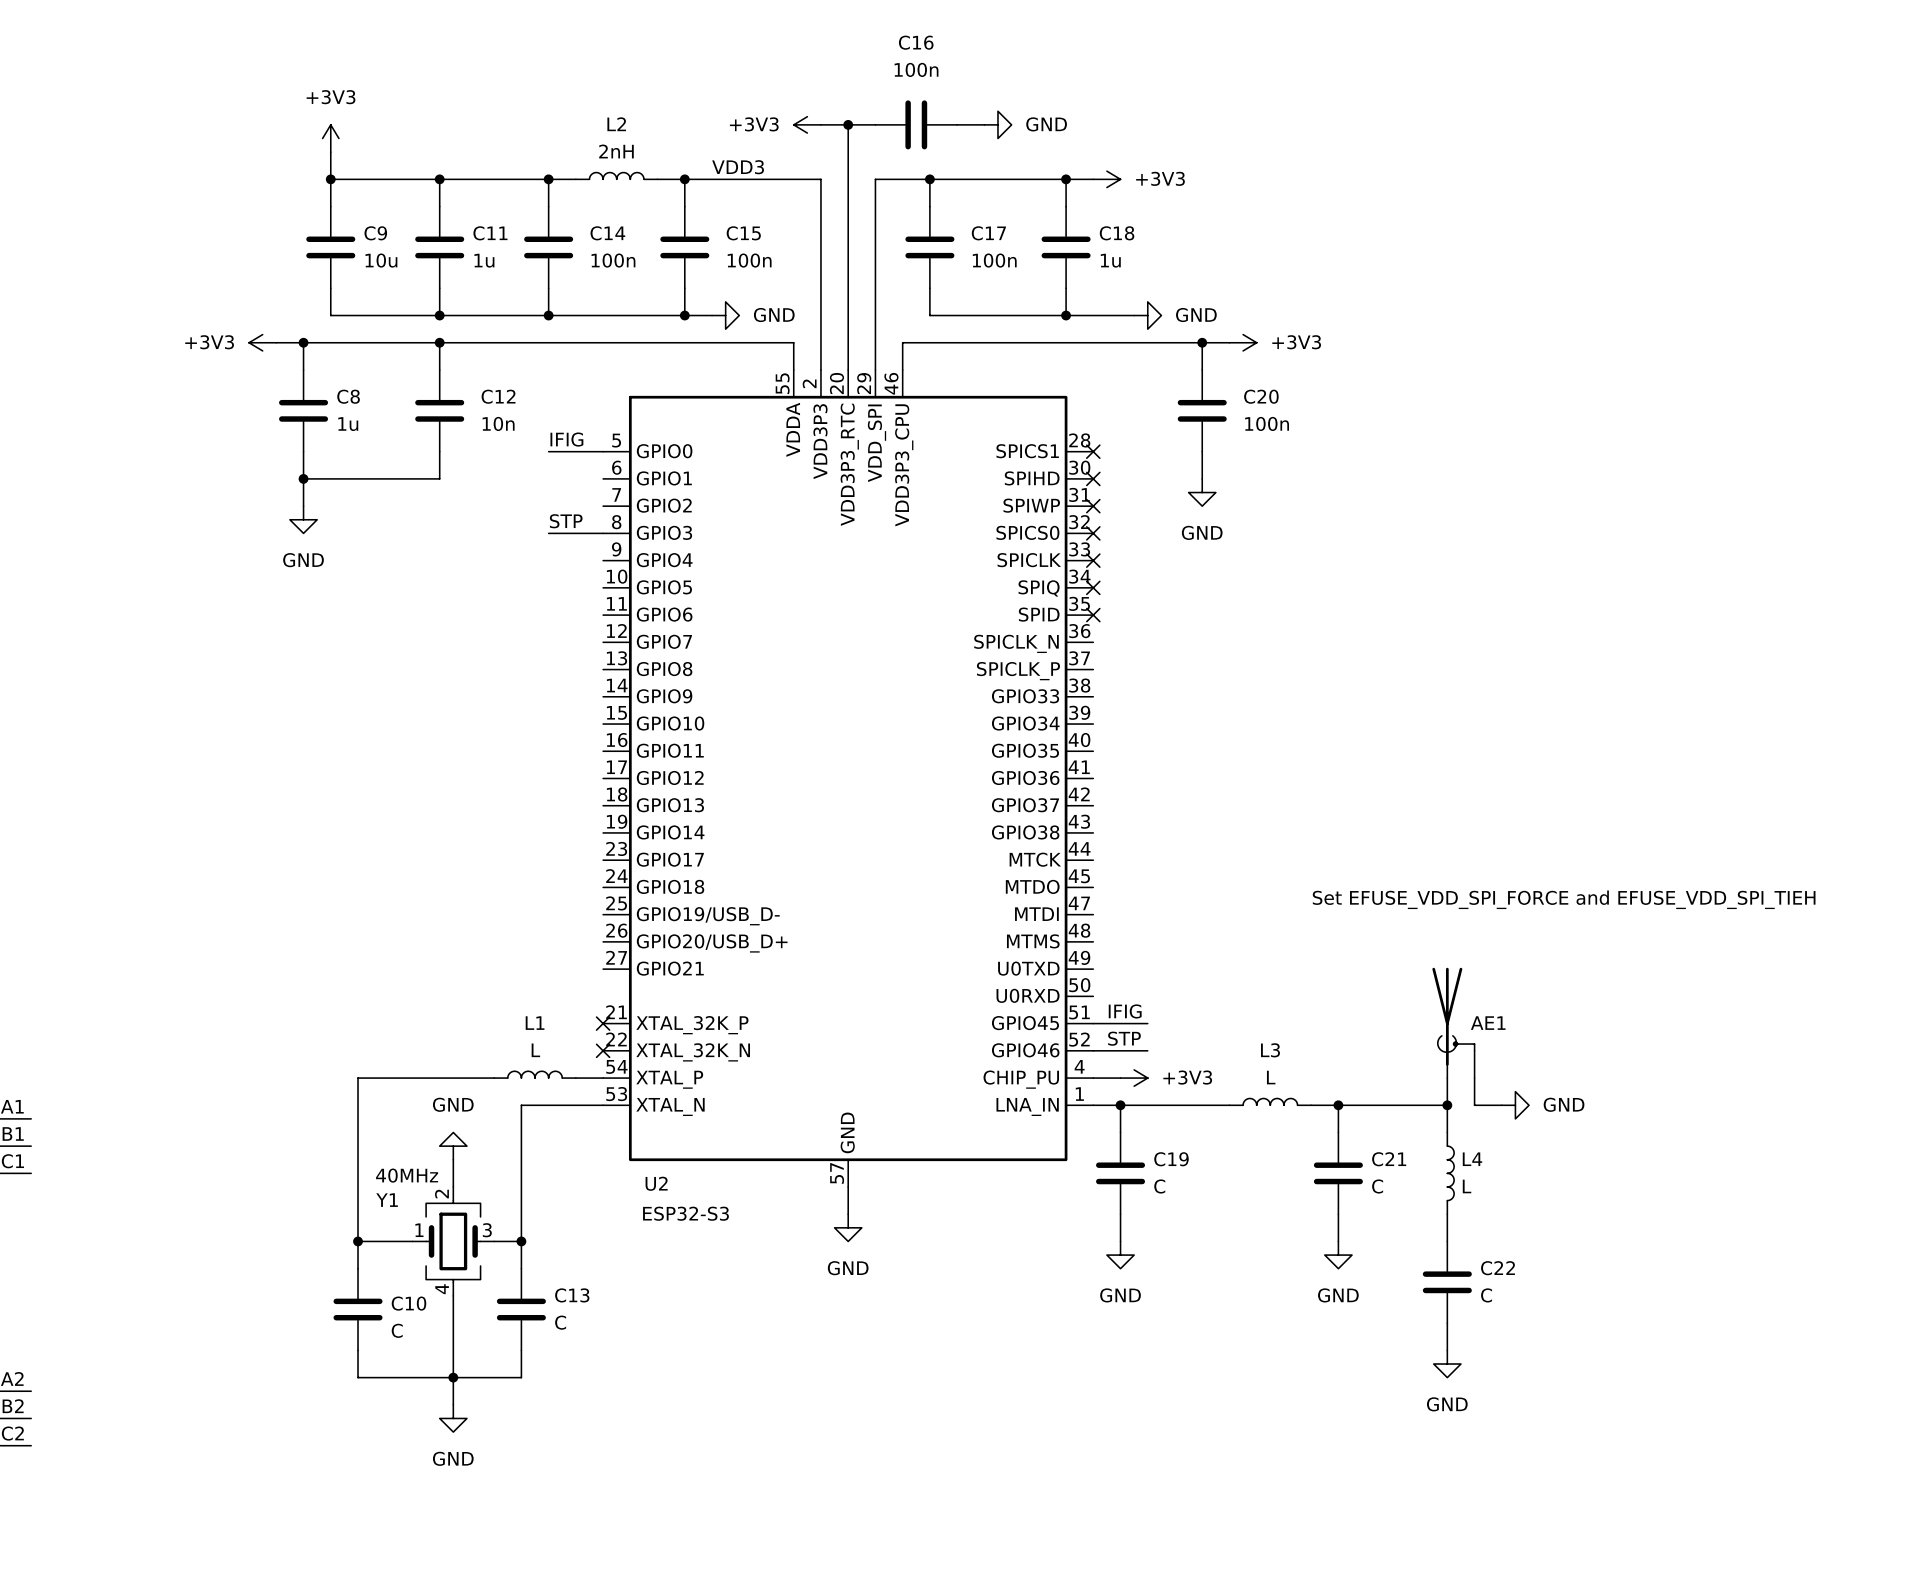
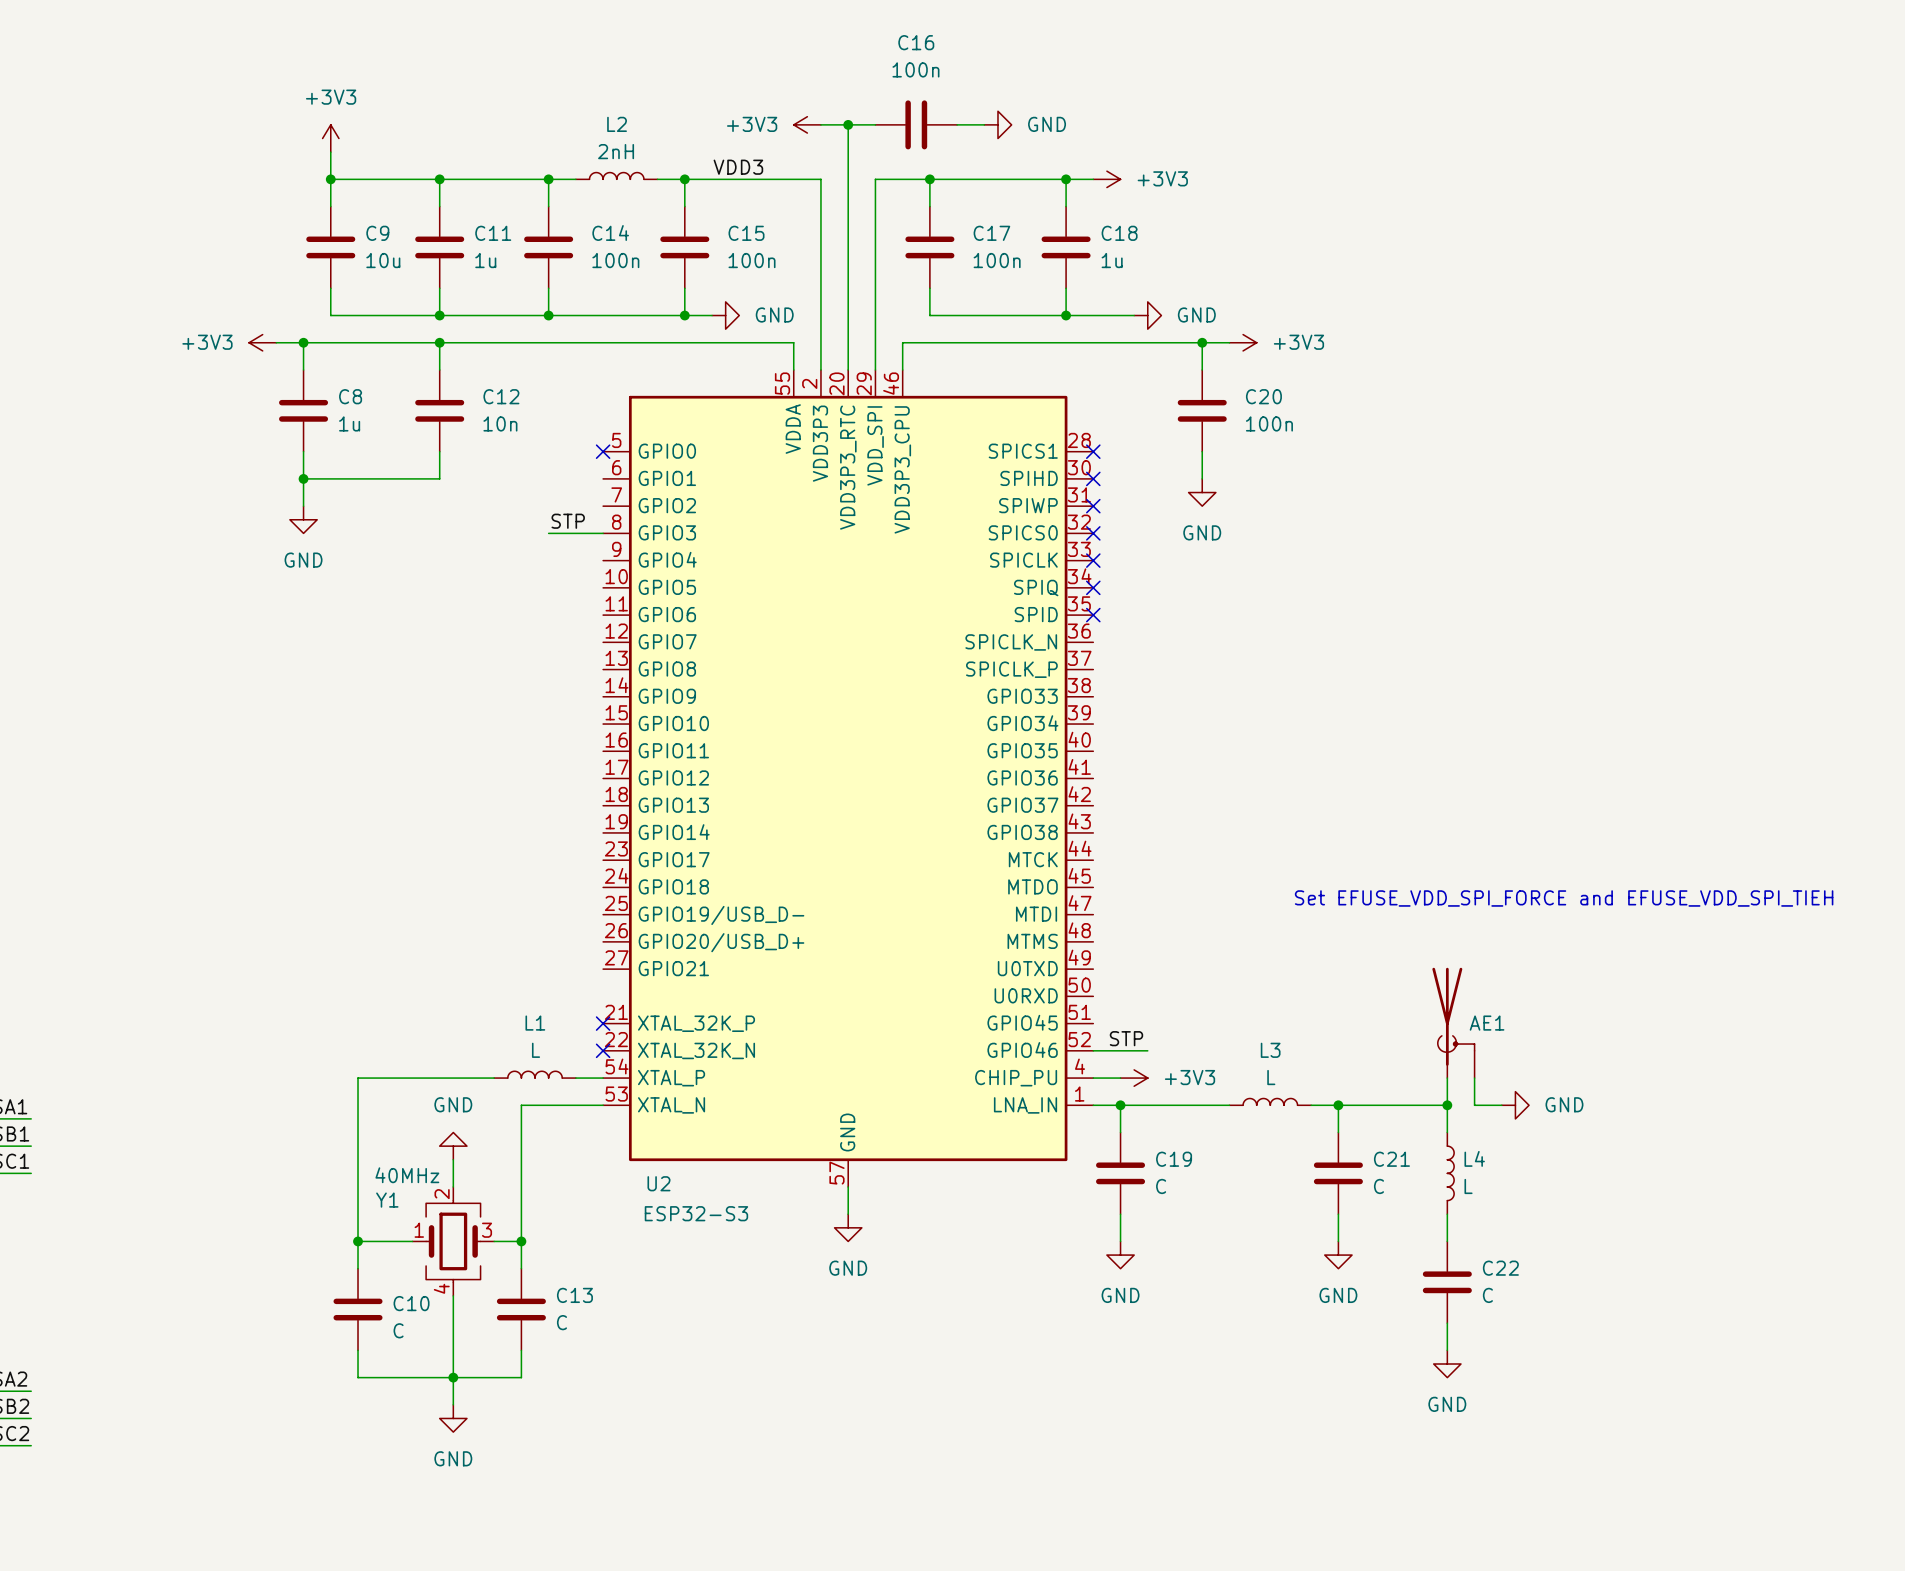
label: IFIG (566, 439) -> none
wire: (548, 451) (603, 451) -> none
no-connect mark: none -> (603, 451)
label: IFIG (1125, 1011) -> none
wire: (1093, 1023) (1147, 1023) -> none

